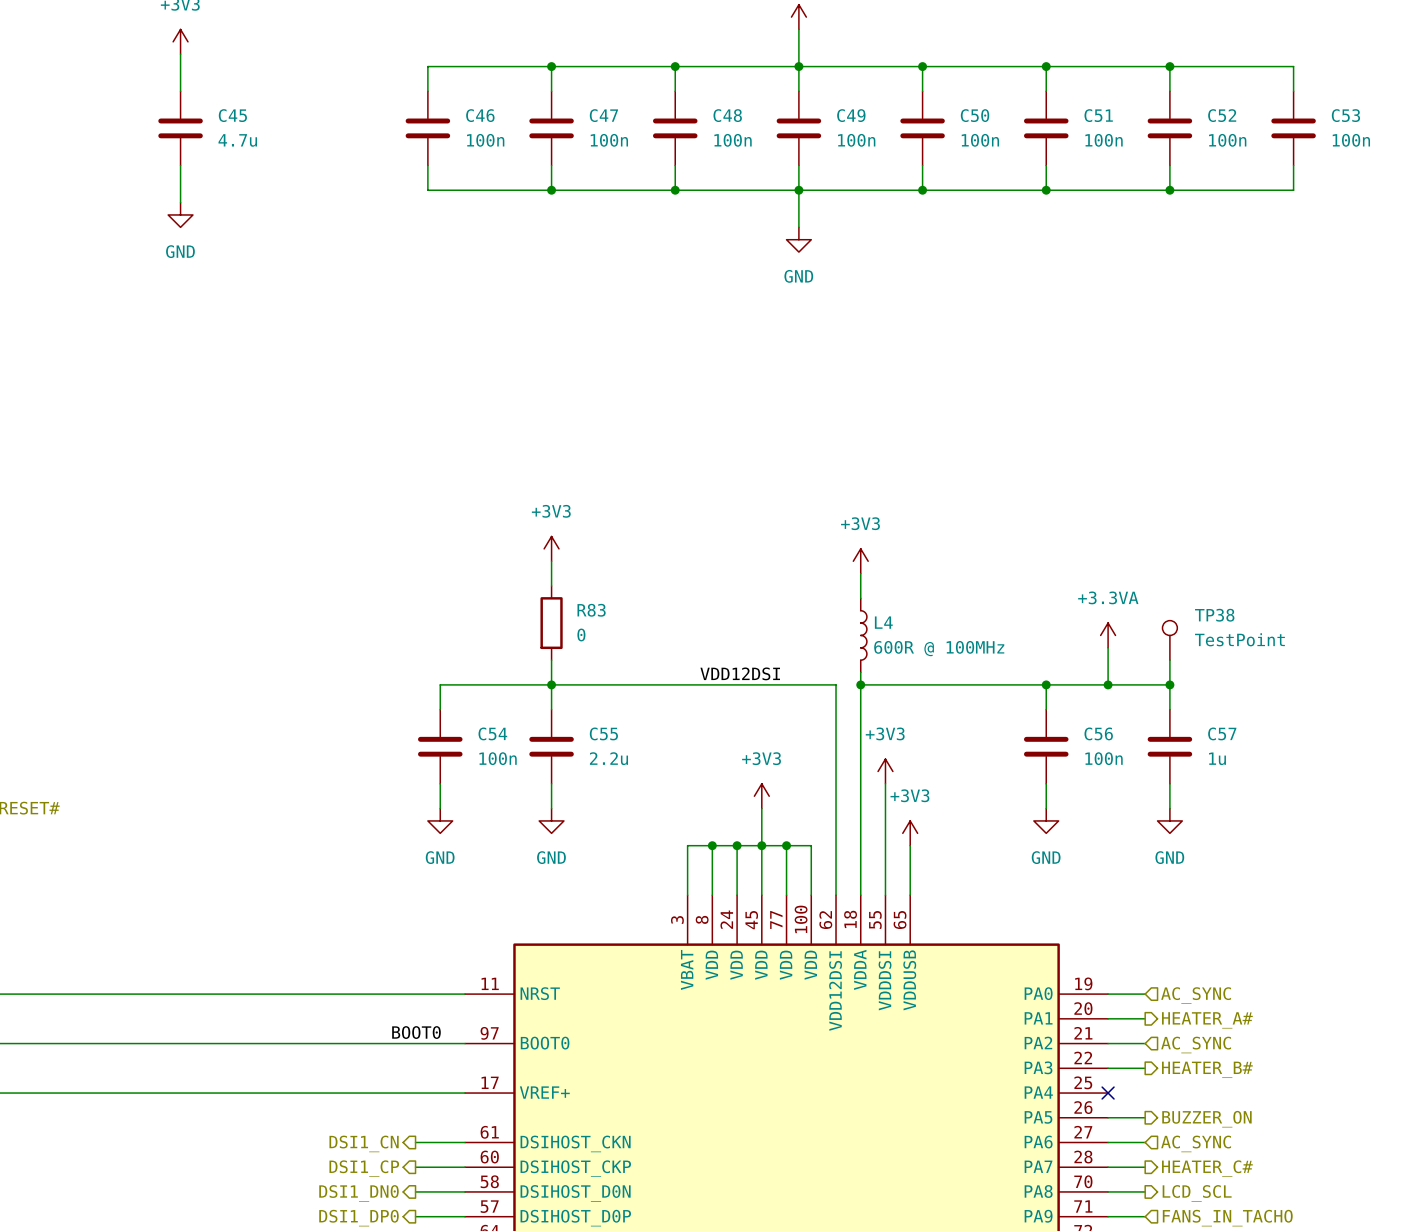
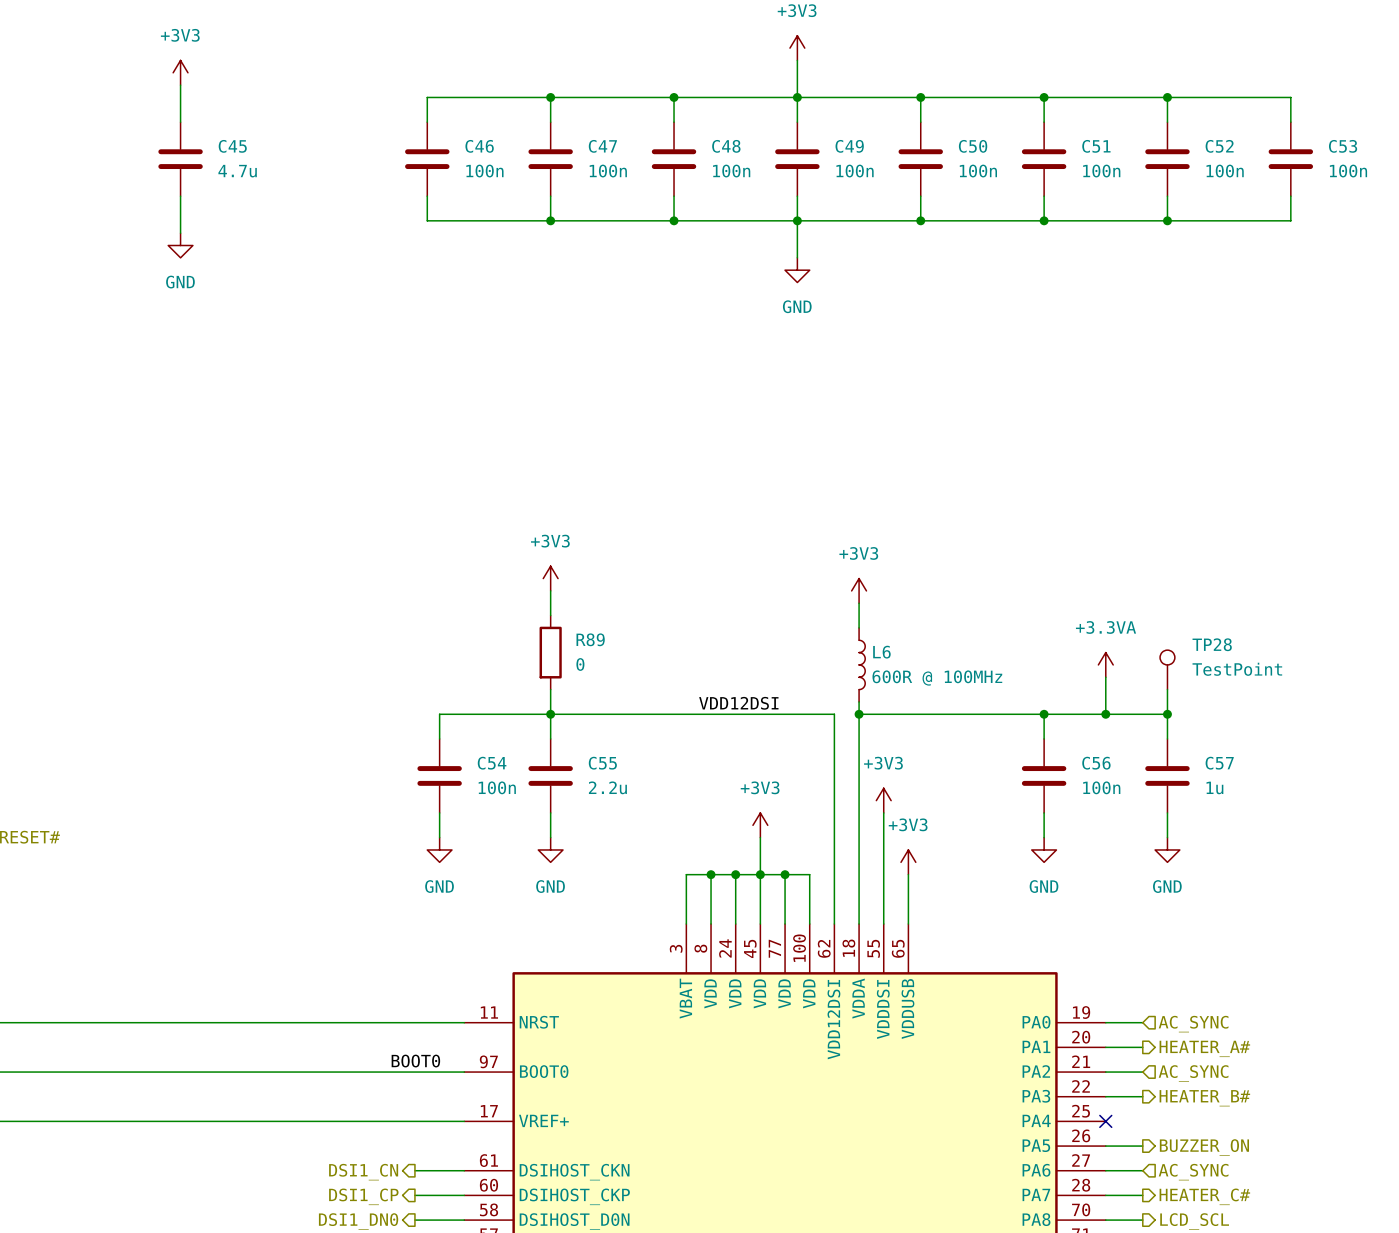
R83 name: R83 (591, 610) -> R89 (590, 639)
TP38 name: TP38 (1214, 615) -> TP28 (1212, 644)
L4 name: L4 (883, 622) -> L6 (881, 652)

